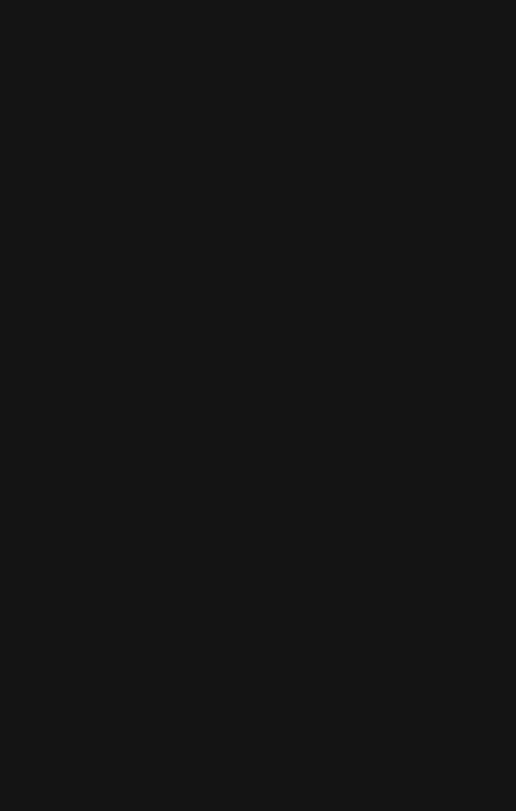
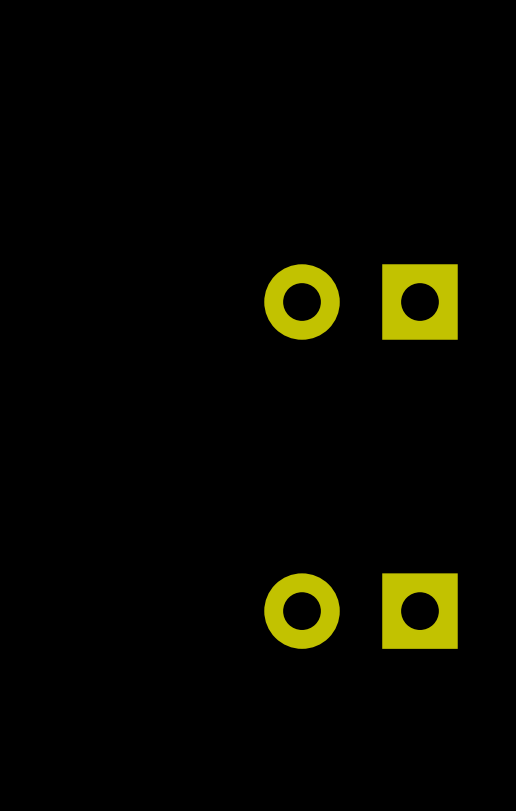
part: none -> (360, 302)
part: none -> (360, 611)

